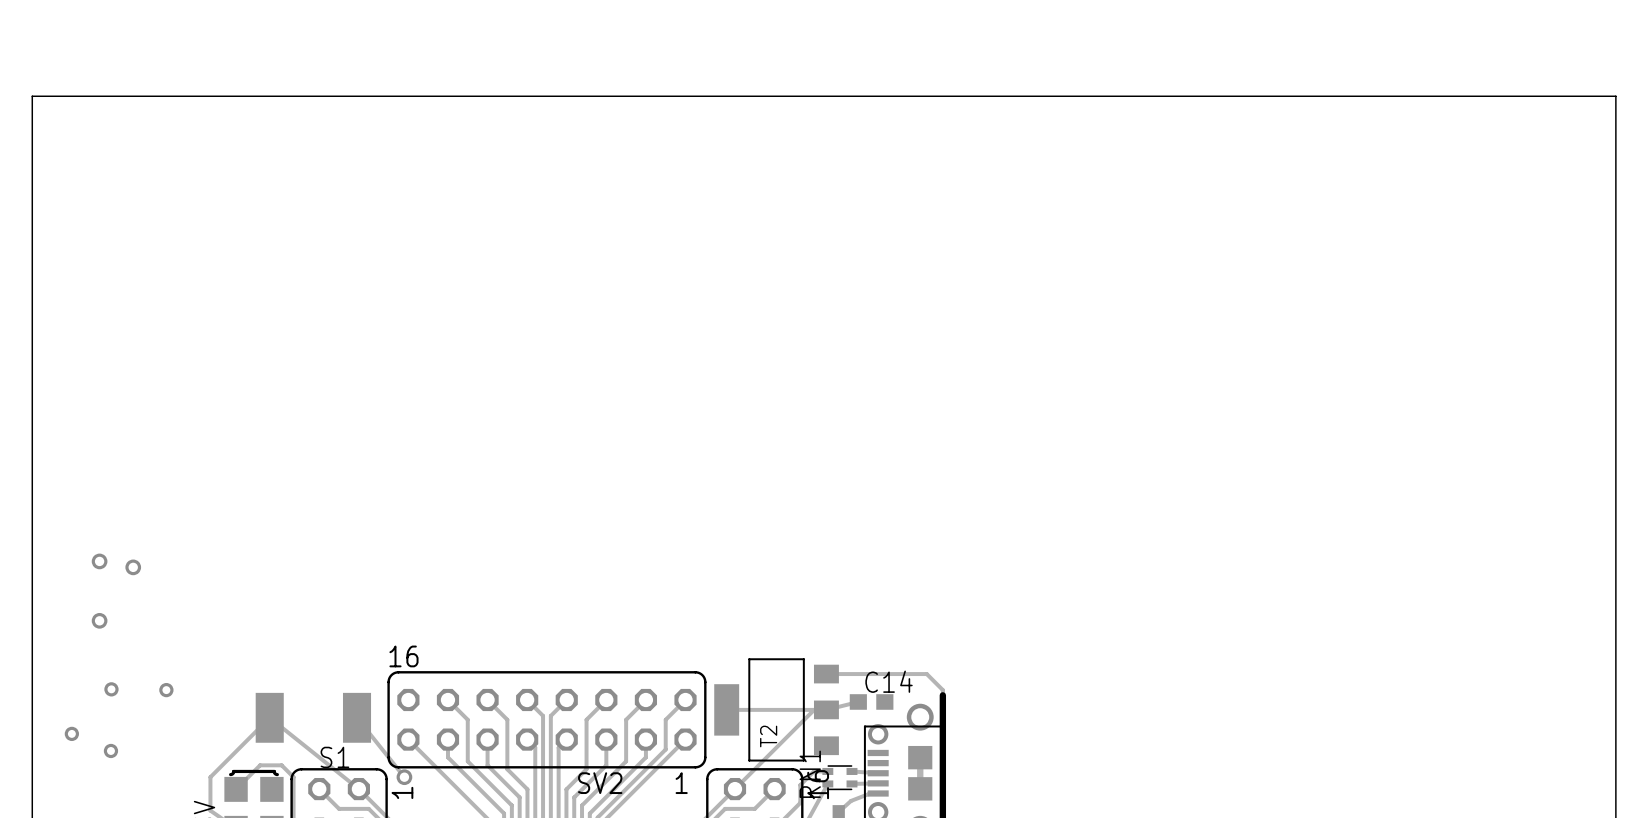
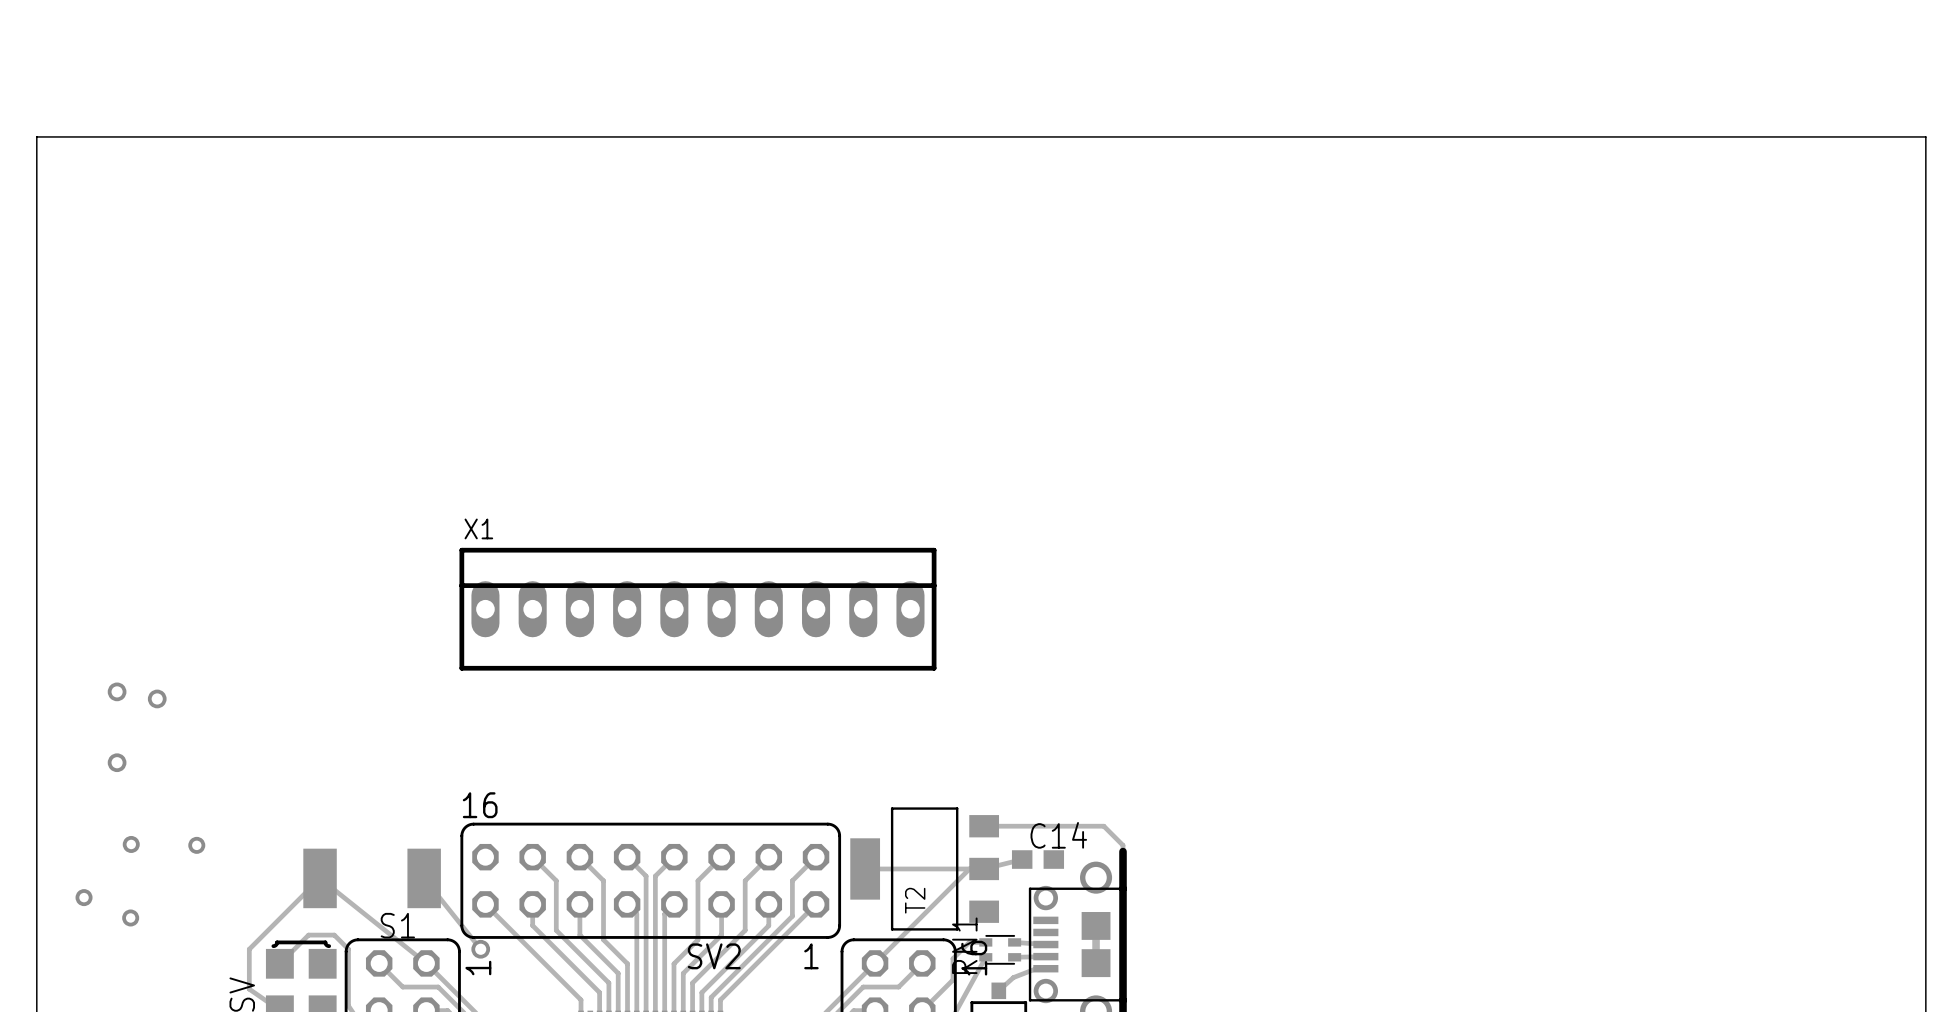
X1: none -> (697, 609)

